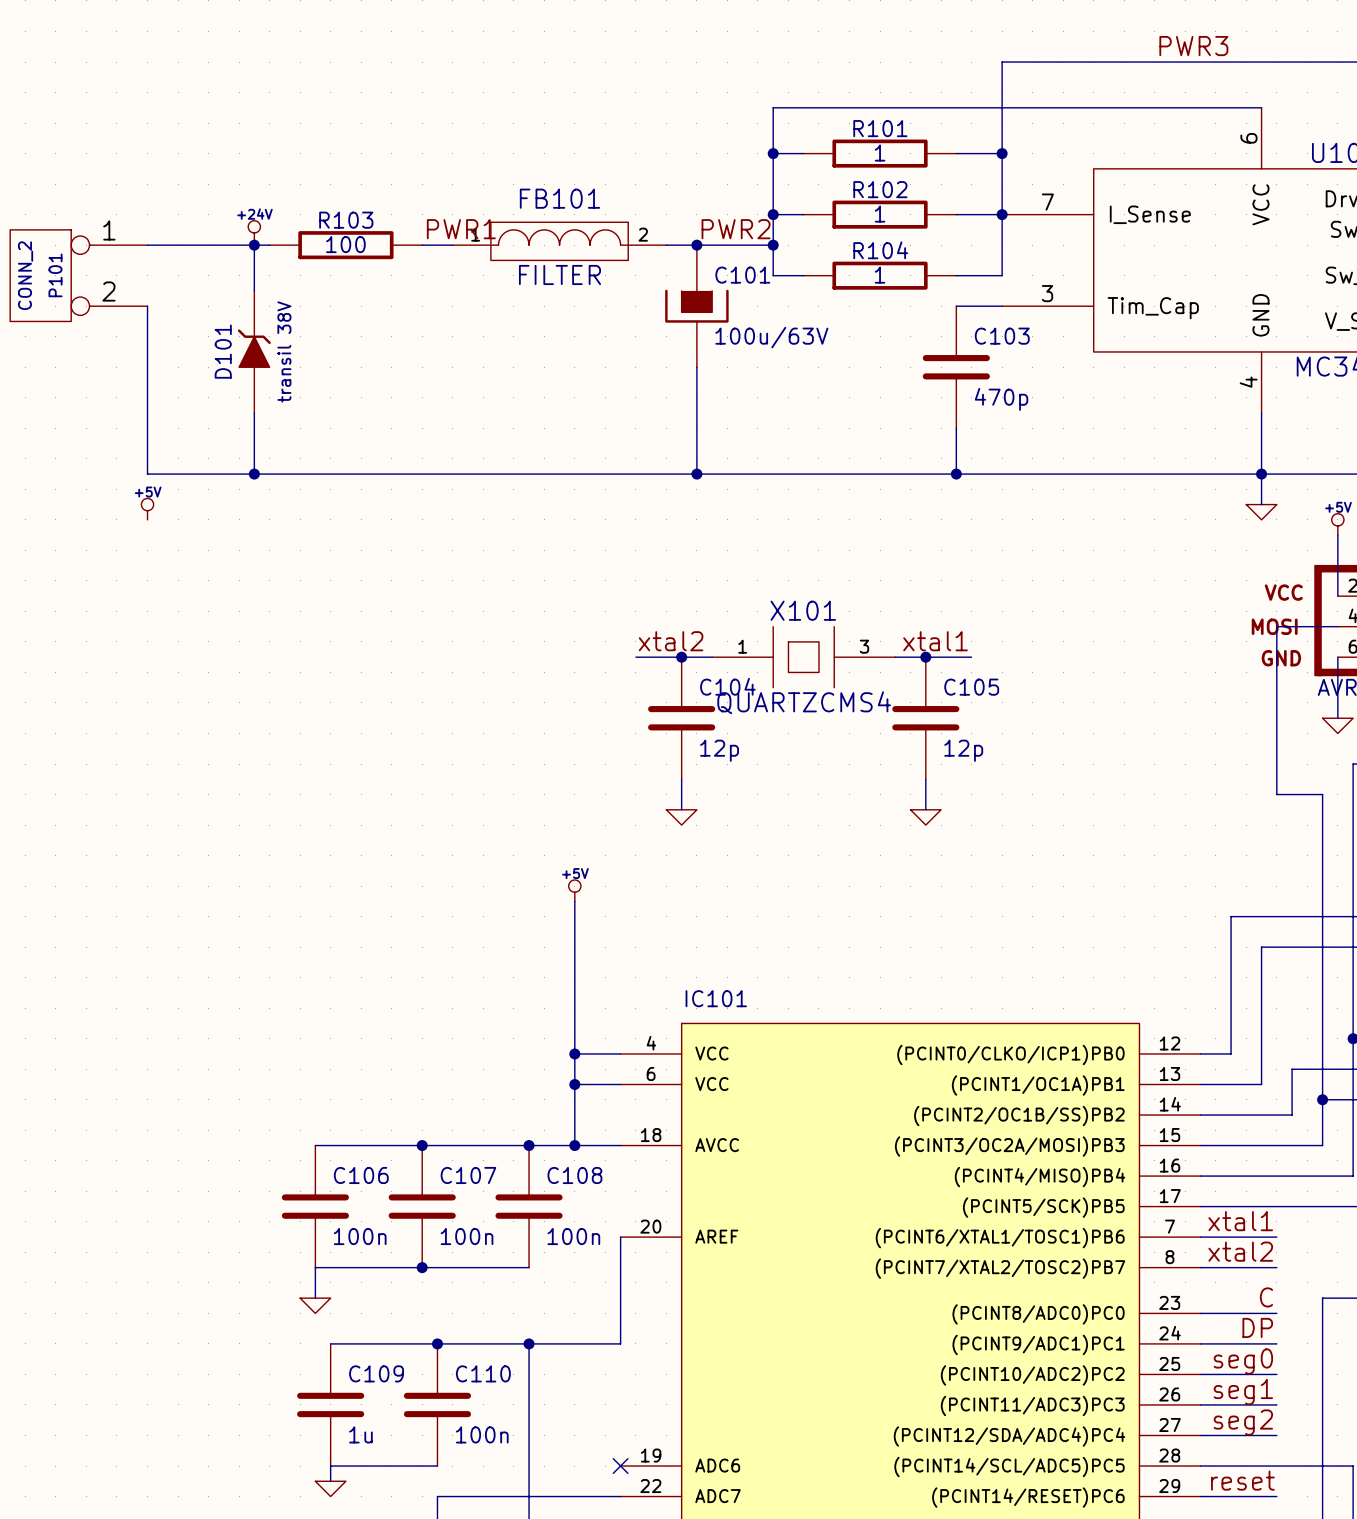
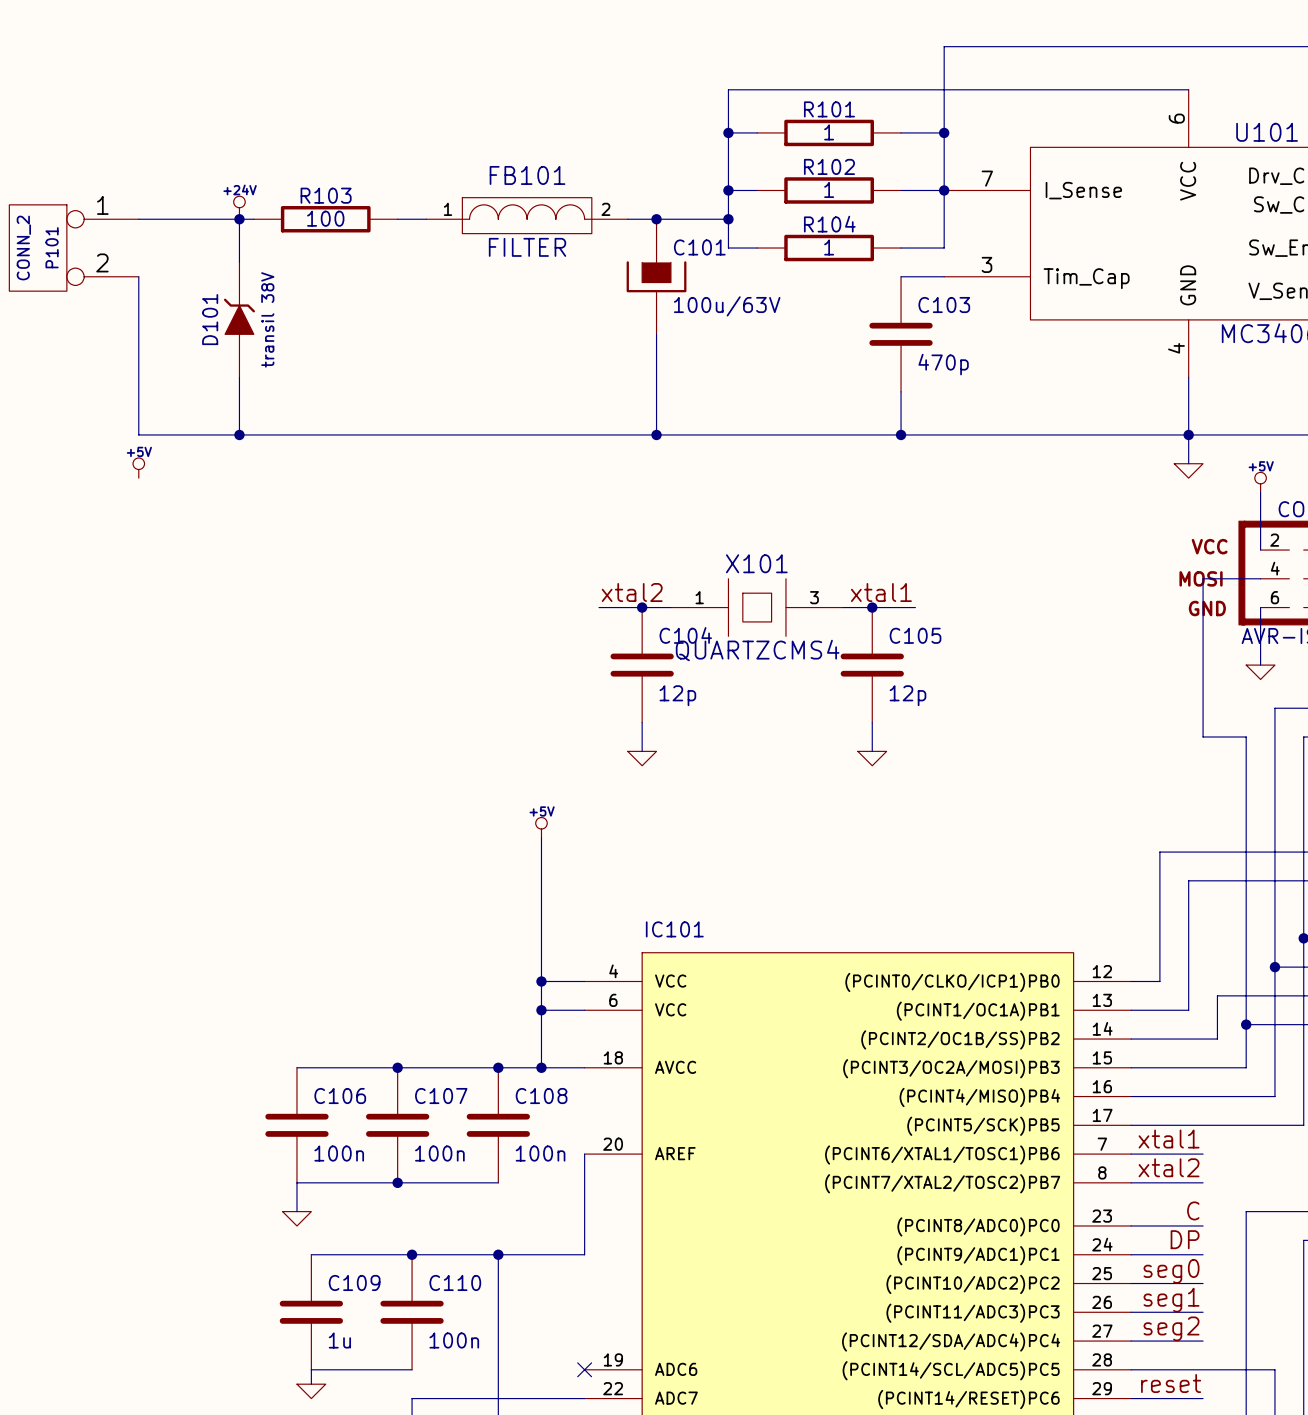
label: PWR3 (1193, 46) -> none
label: PWR1 (461, 229) -> none
label: PWR2 (736, 229) -> none

